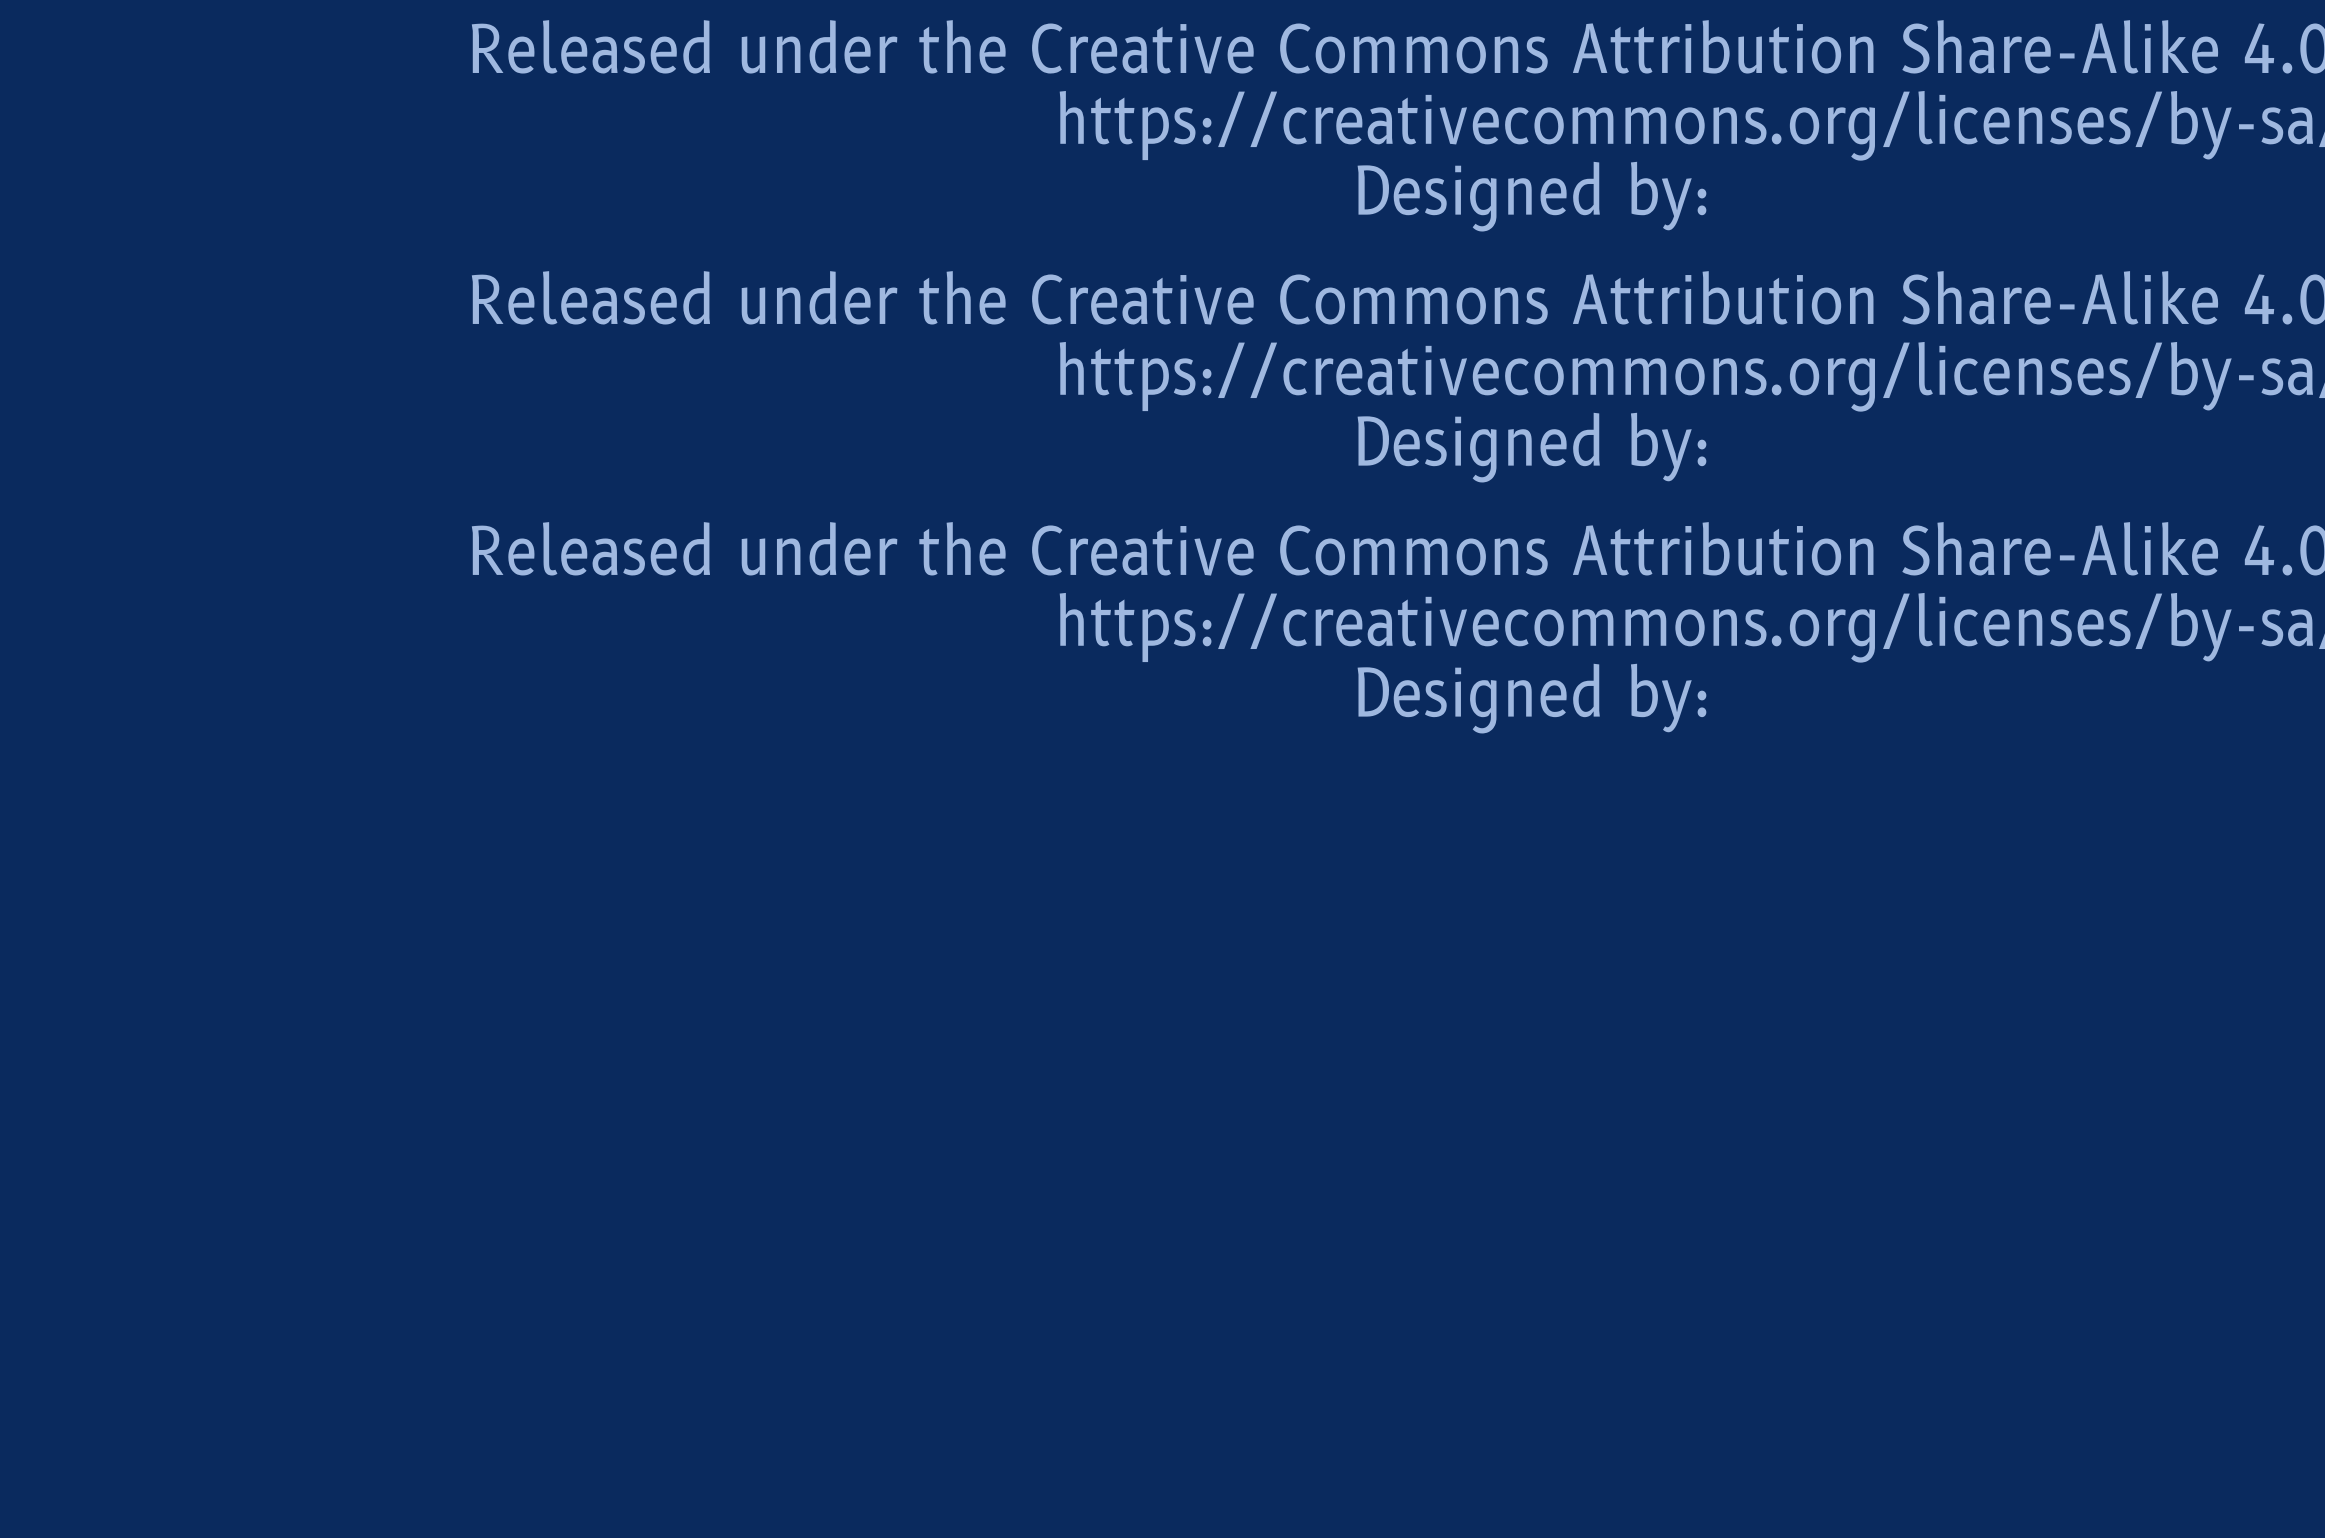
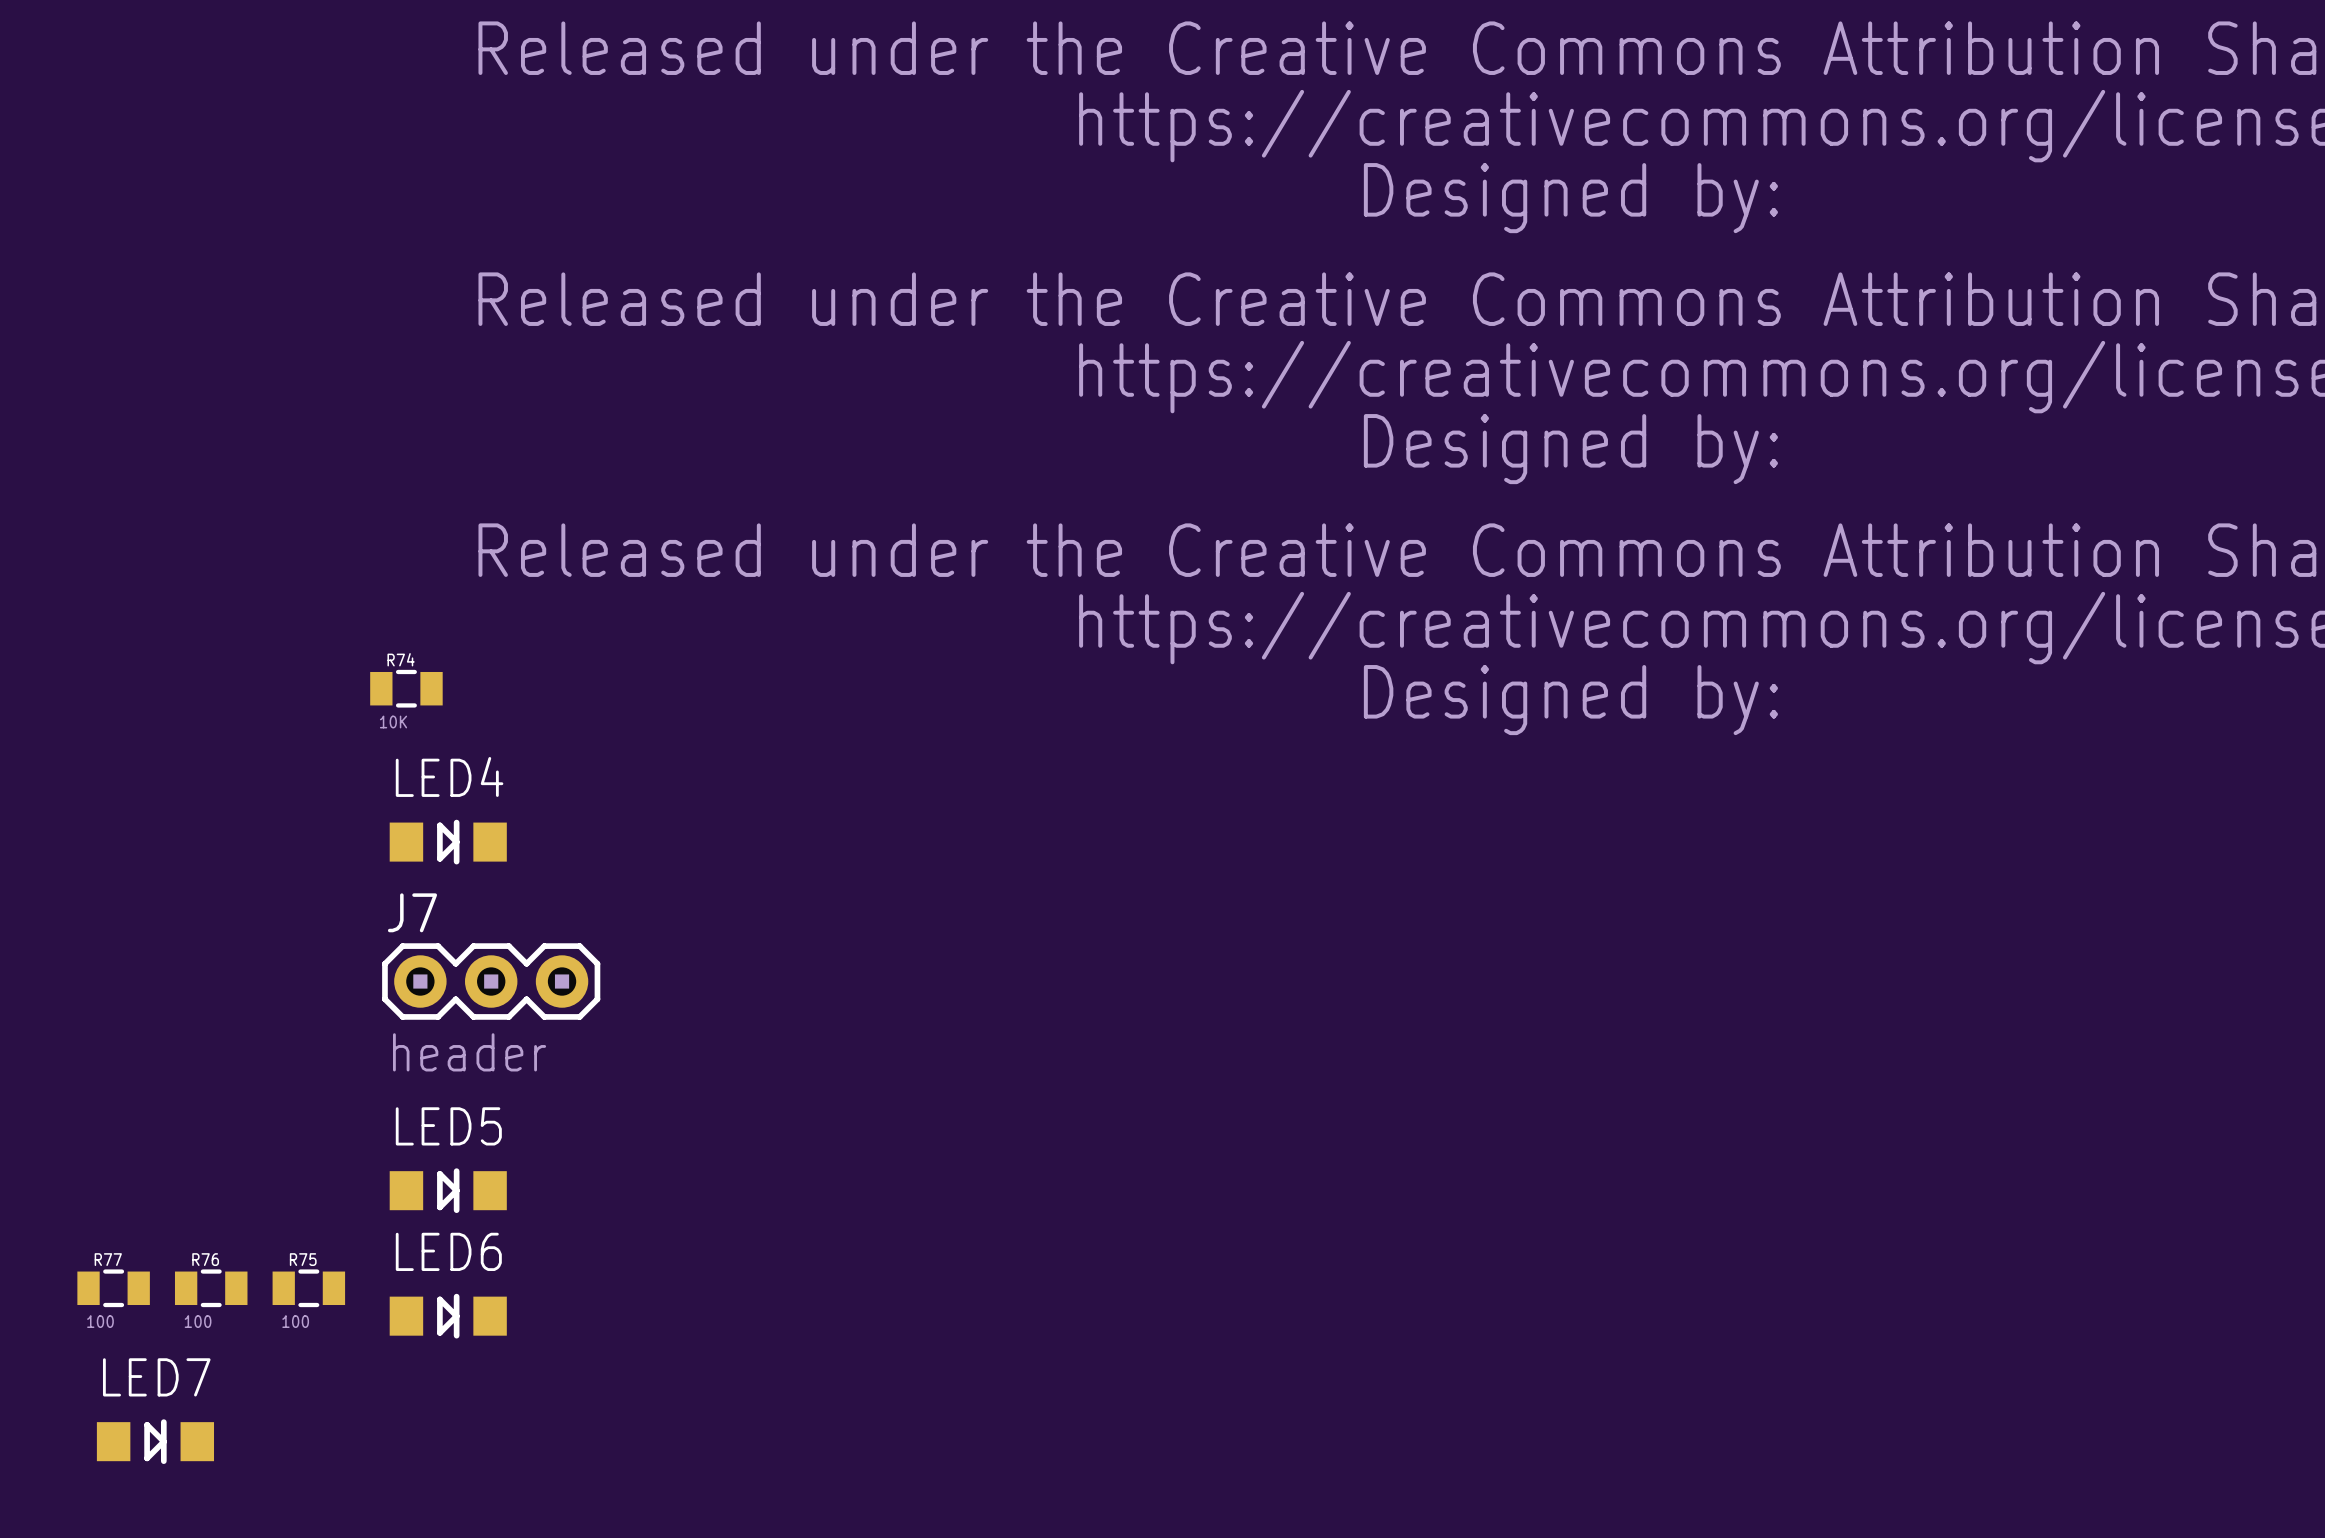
R74: none -> 10K (406, 688)
LED4: none -> (448, 842)
J7: none -> header (491, 981)
LED5: none -> (448, 1190)
R77: none -> 100 (113, 1288)
R76: none -> 100 (211, 1288)
R75: none -> 100 (308, 1288)
LED6: none -> (448, 1316)
LED7: none -> (155, 1441)

